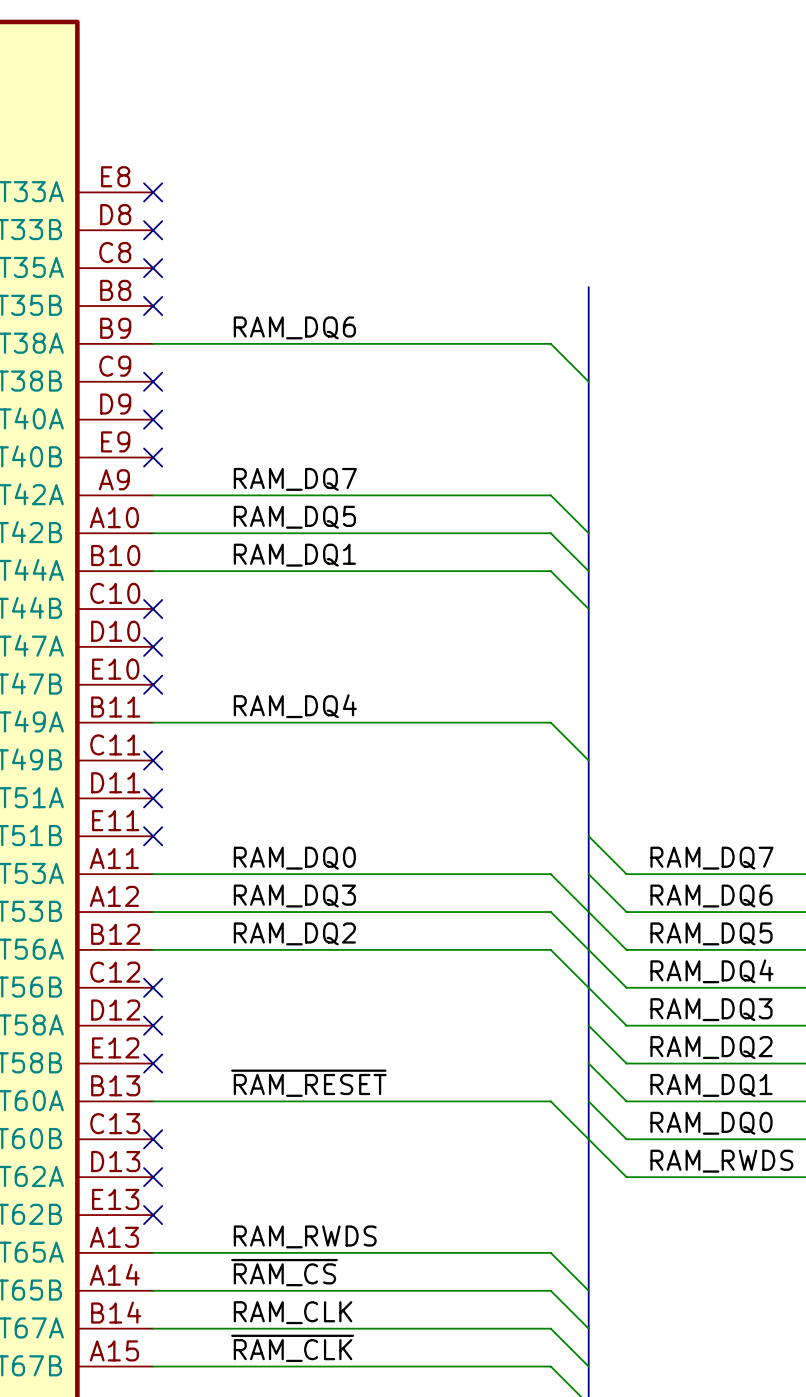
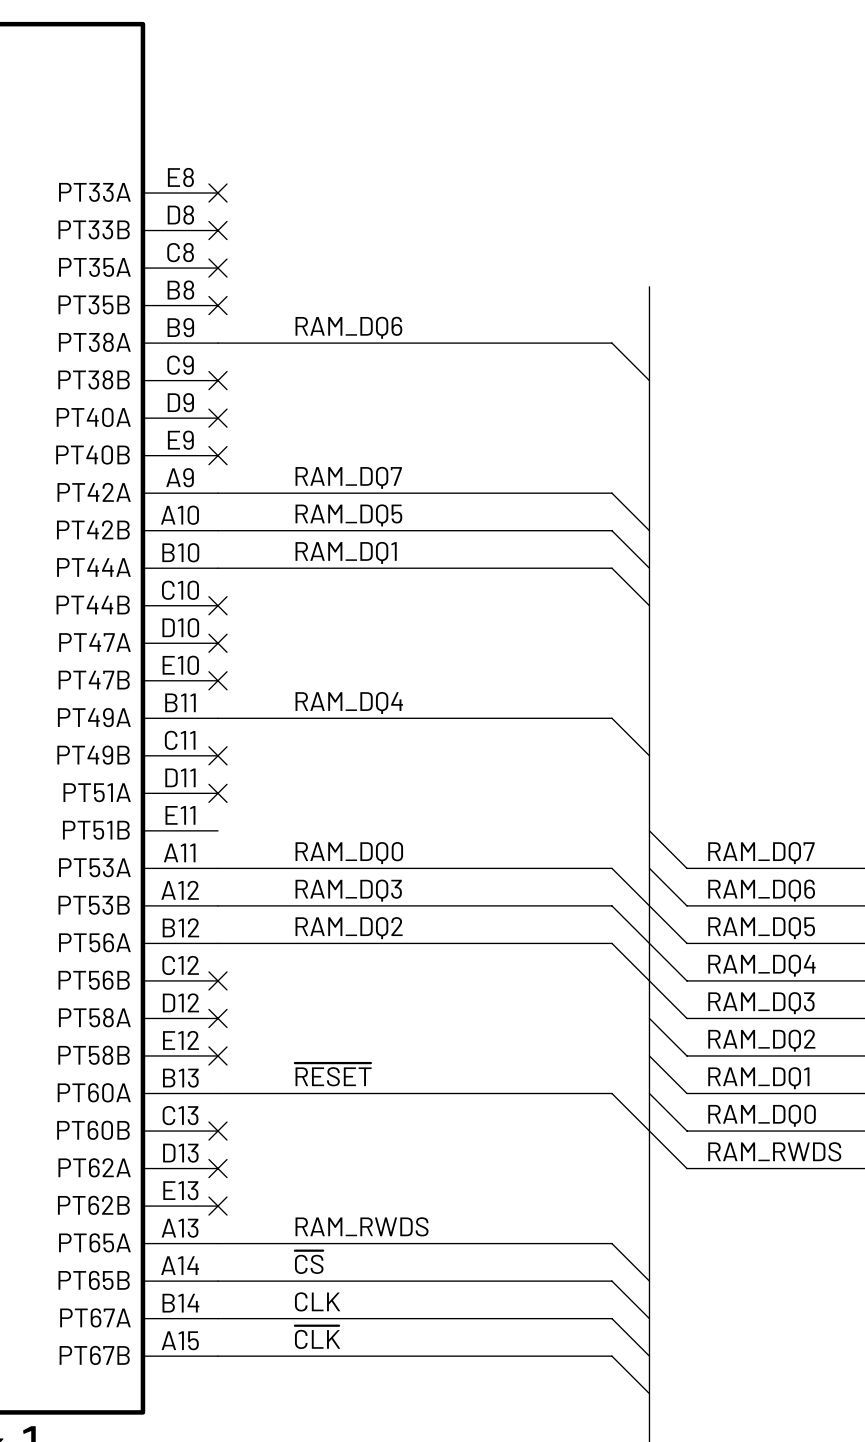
no-connect mark: (153, 836) -> none
label: ~{RAM_RESET} (308, 1083) -> ~{RESET} (333, 1074)
label: ~{RAM_CS} (284, 1272) -> ~{CS} (309, 1262)
label: RAM_CLK (293, 1312) -> CLK (317, 1301)
label: ~{RAM_CLK} (292, 1348) -> ~{CLK} (317, 1337)

